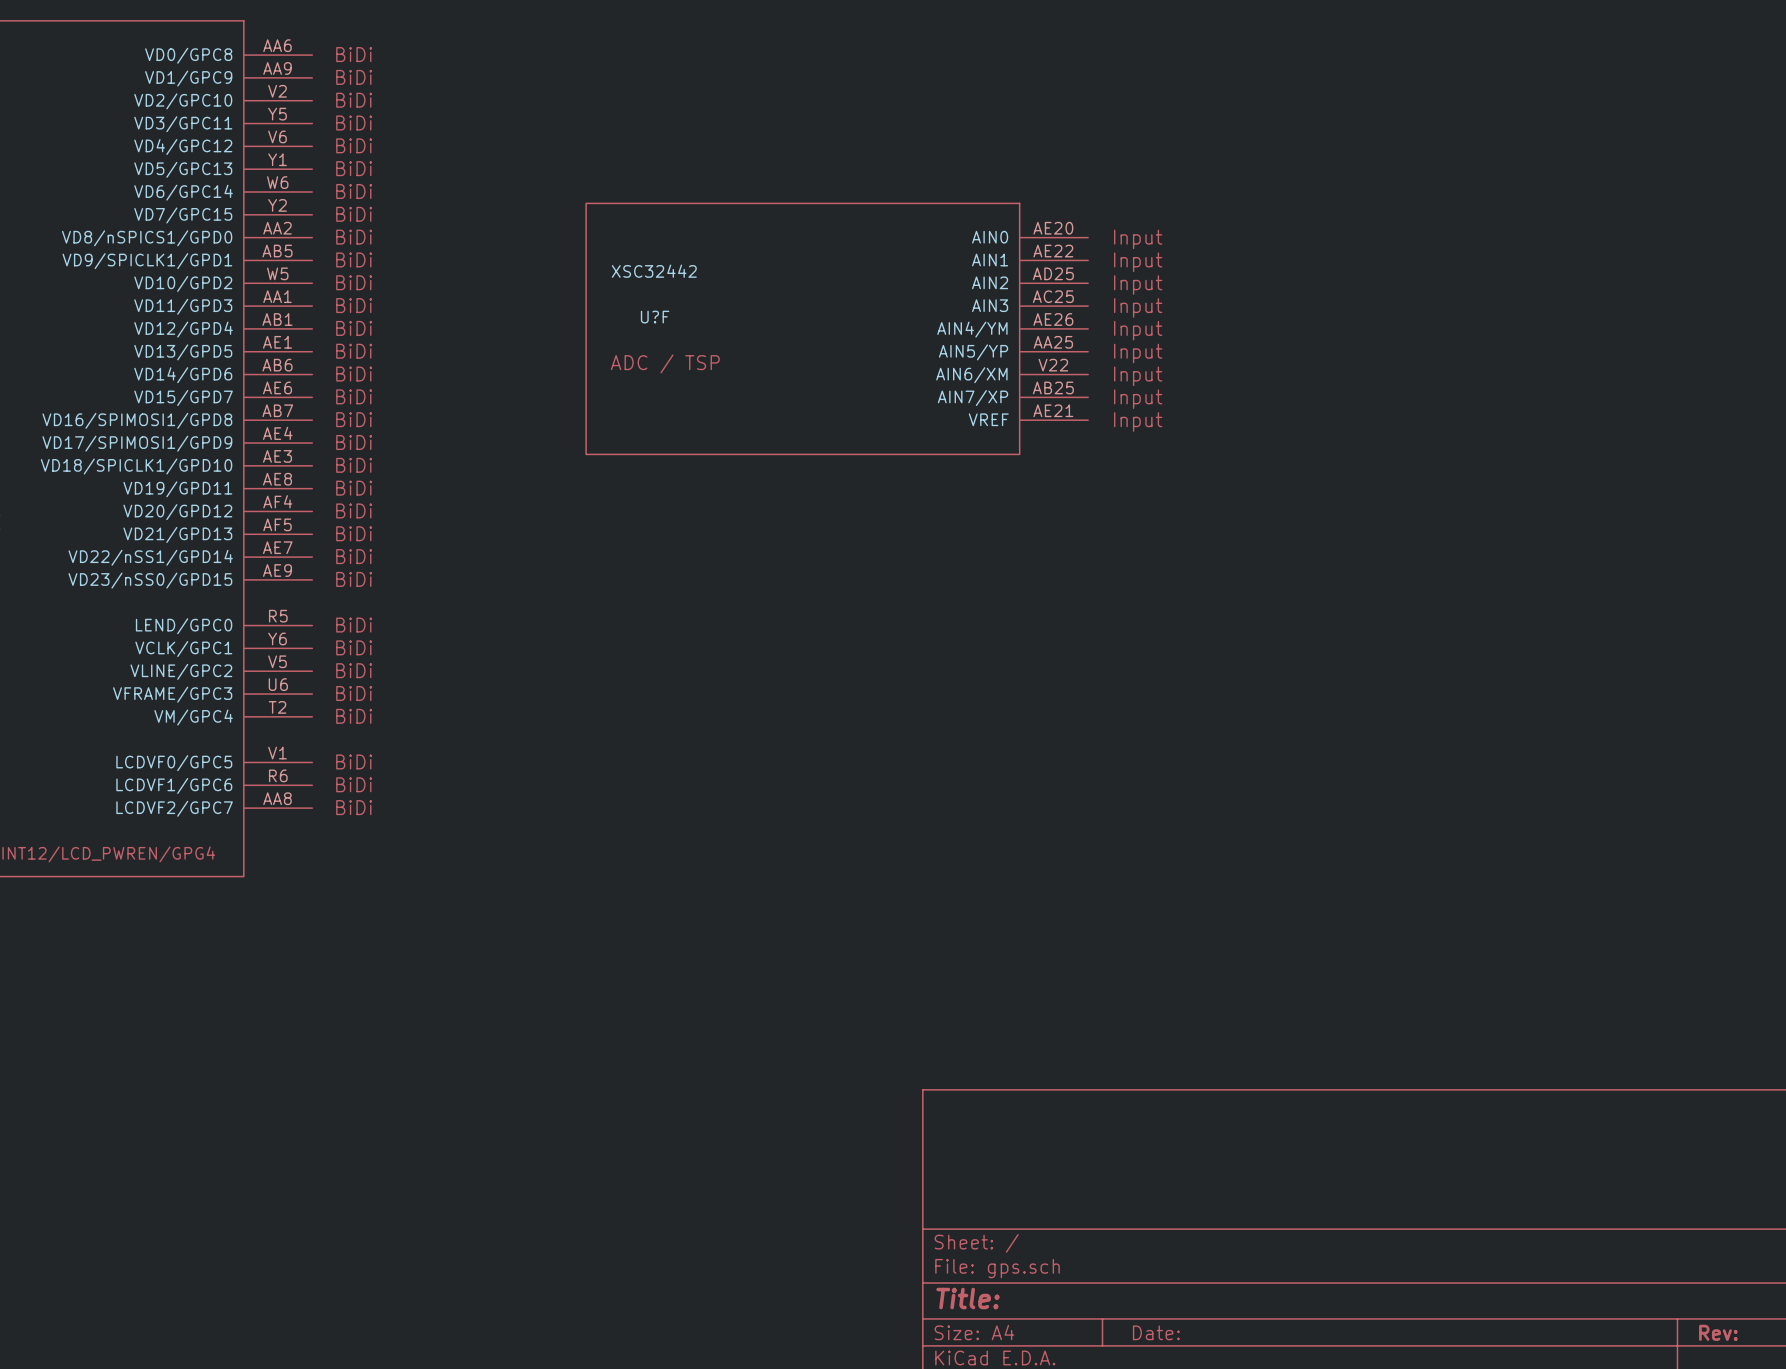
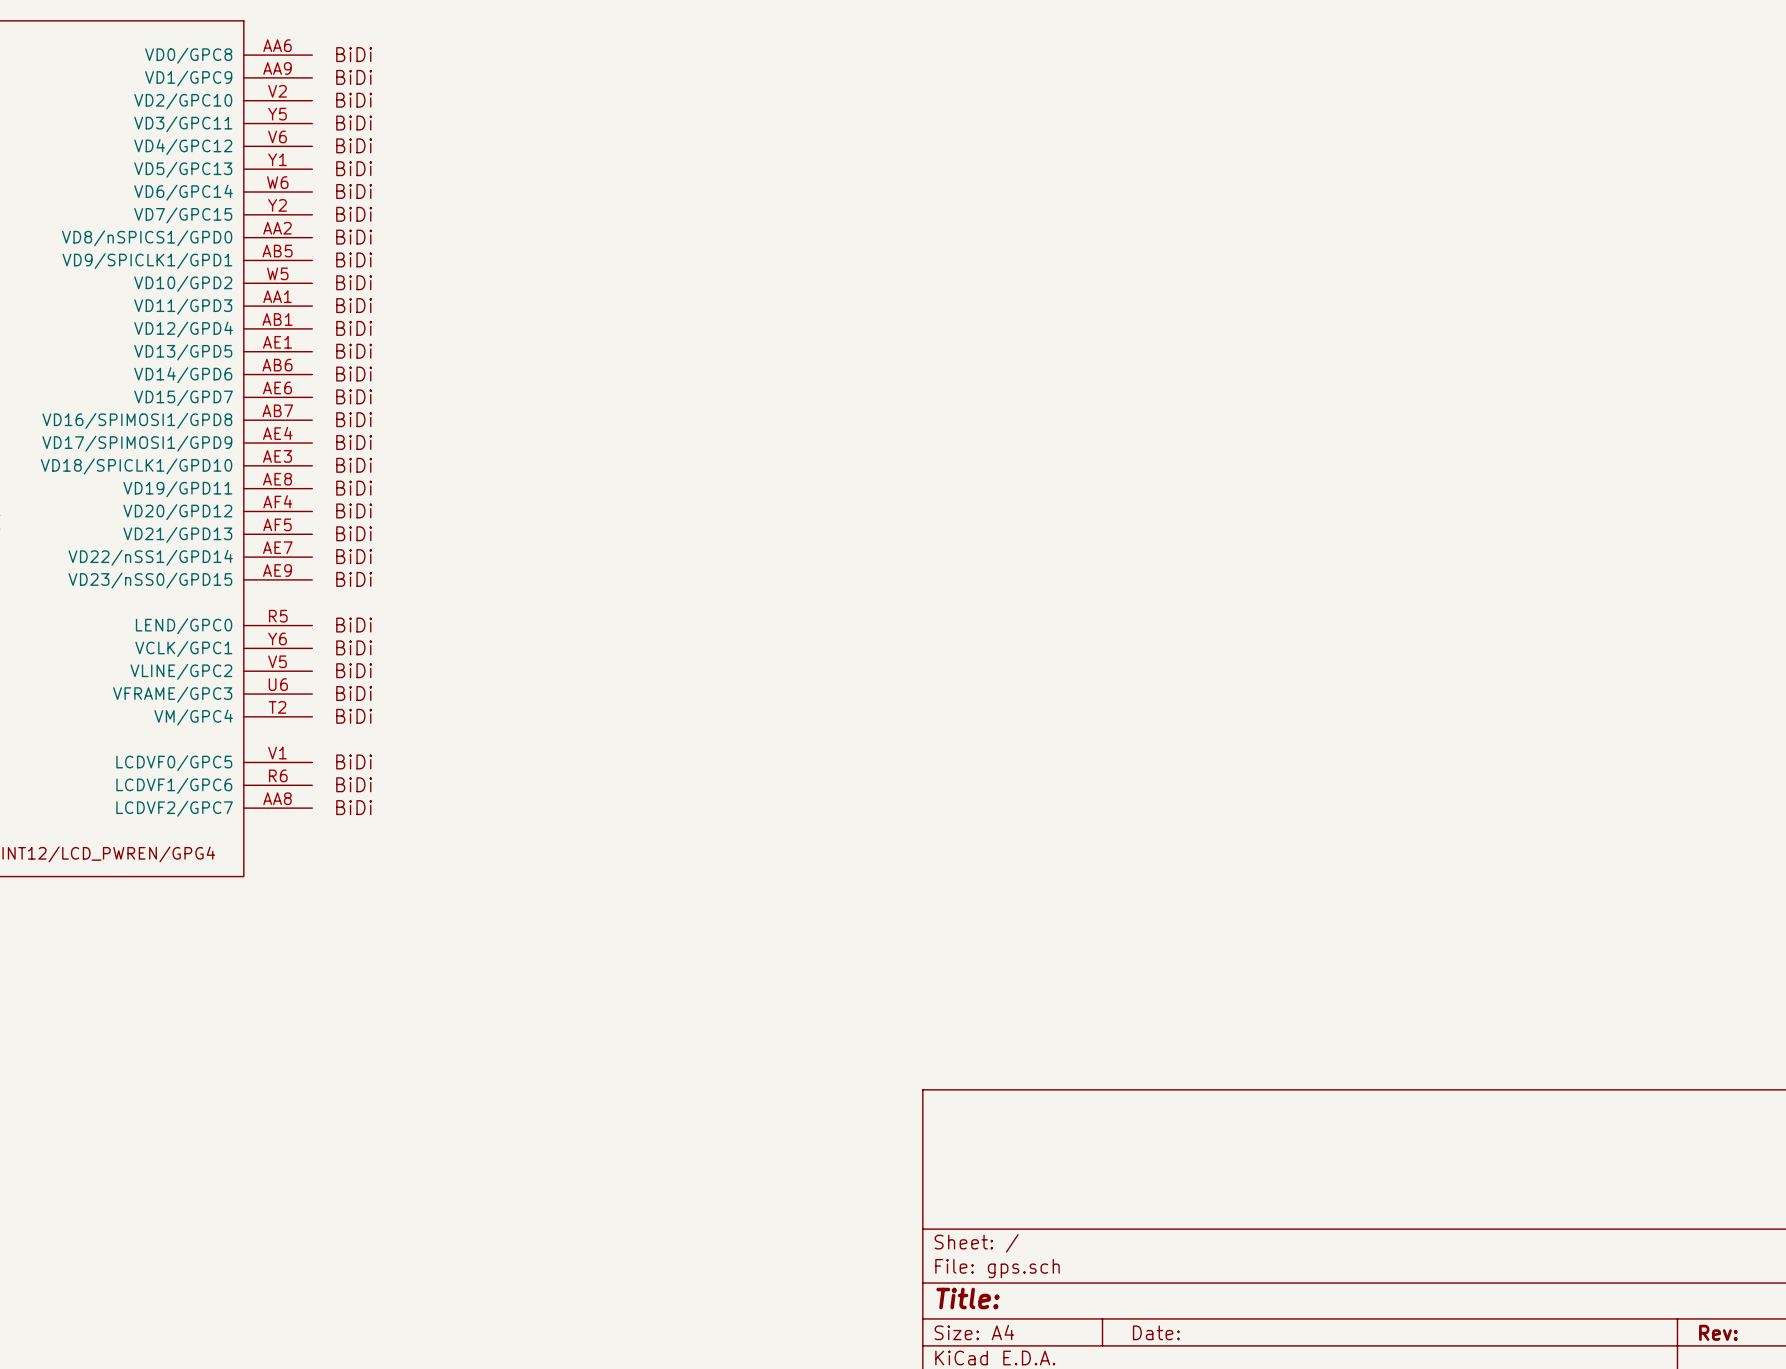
U?F: XSC32442 (837, 328) -> none

